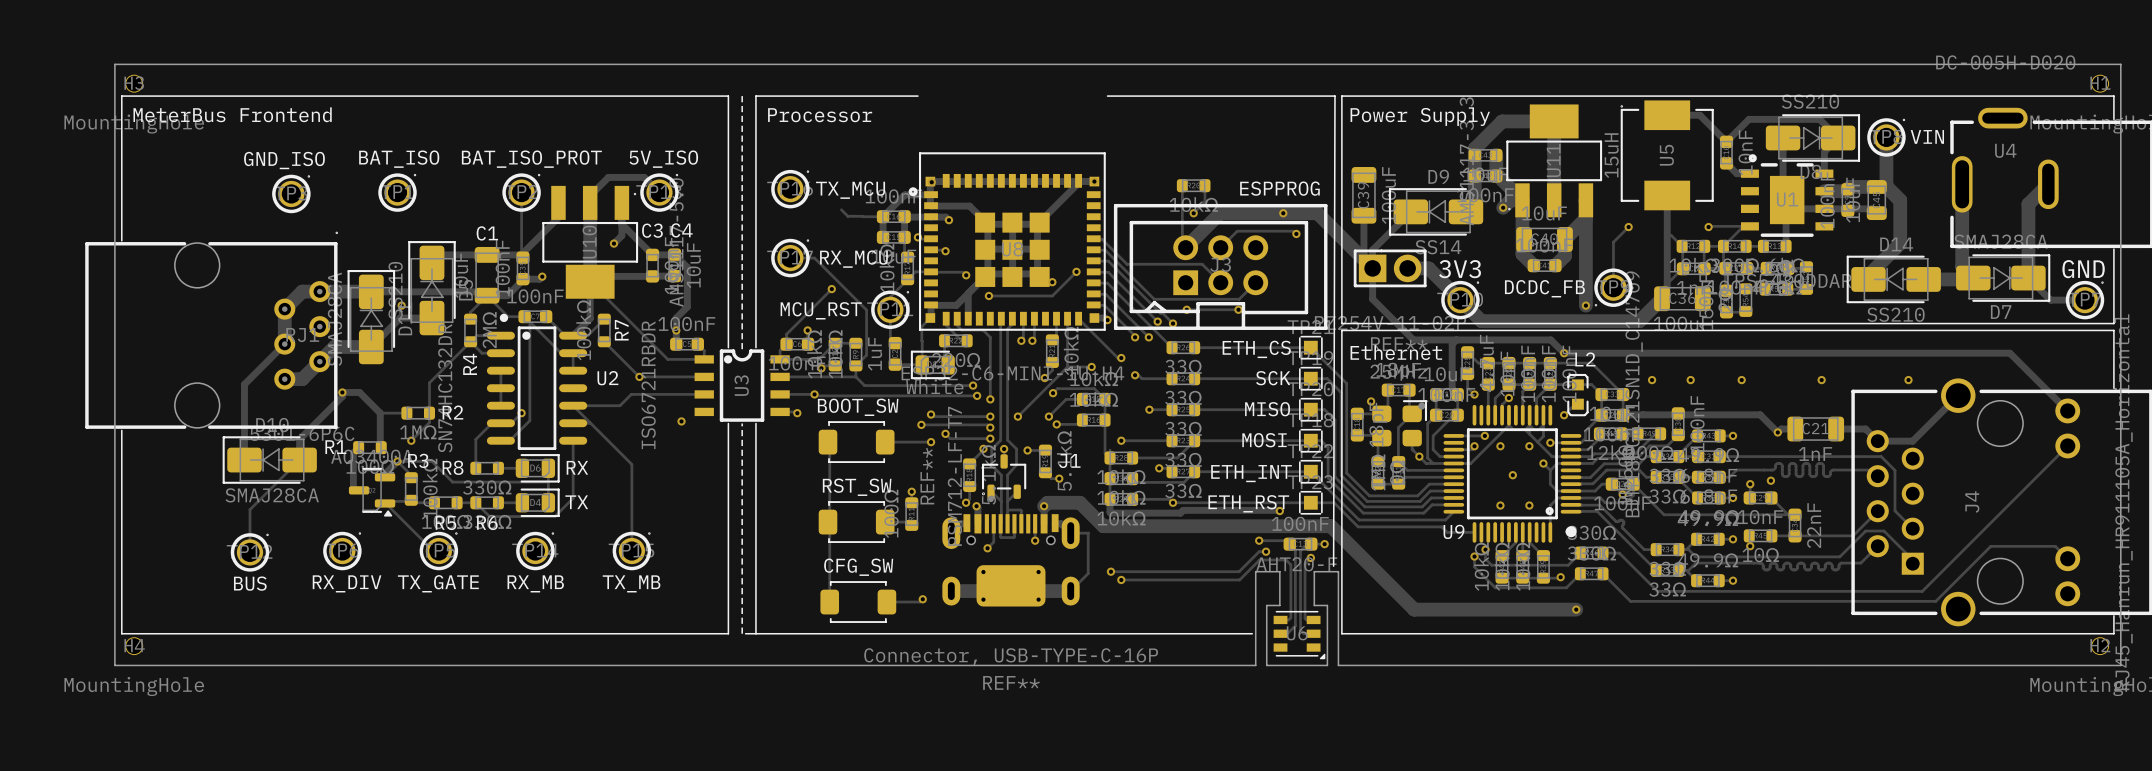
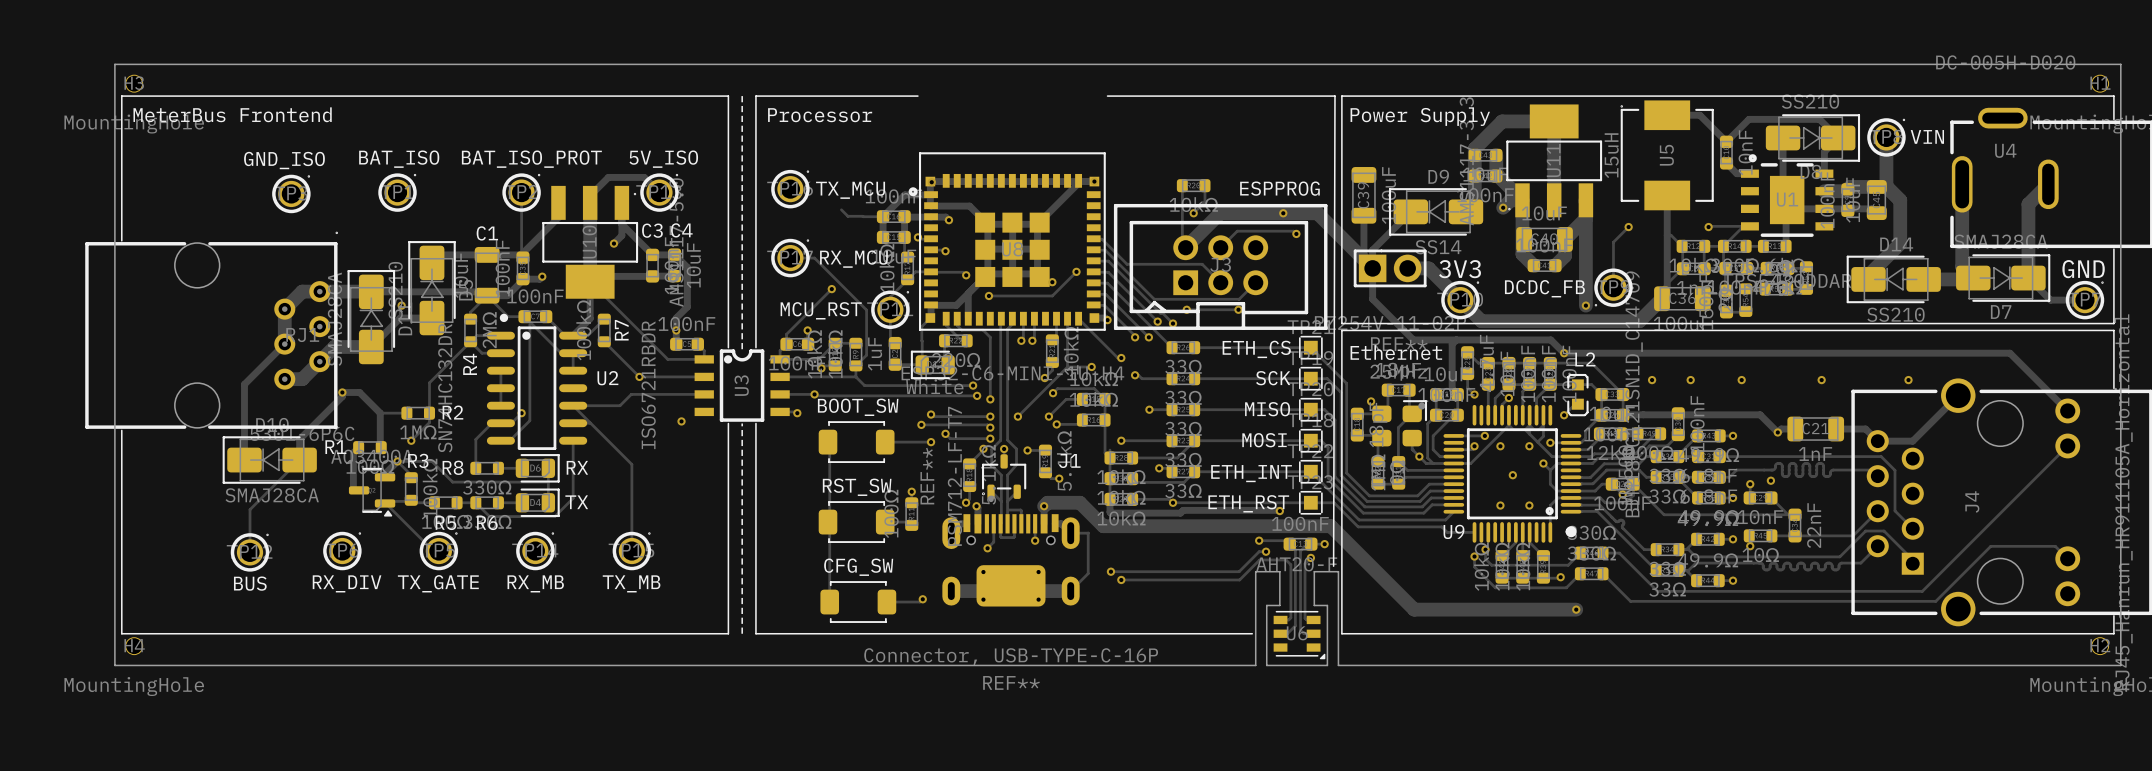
line: (745, 633) (755, 633) -> none

